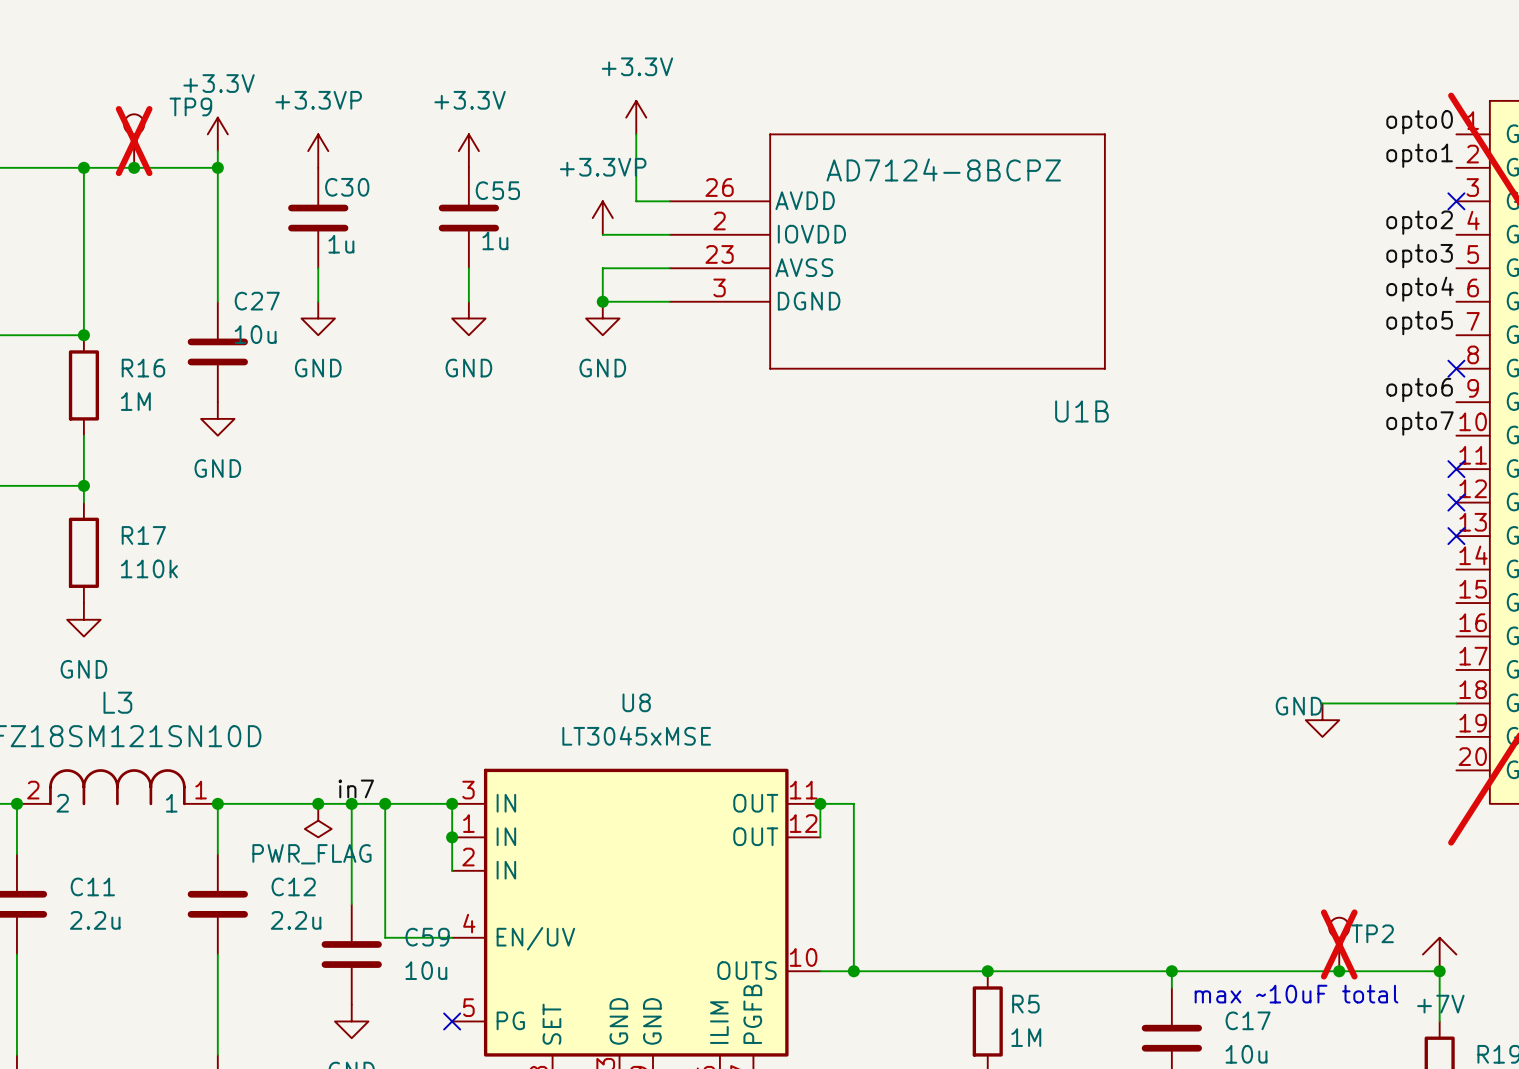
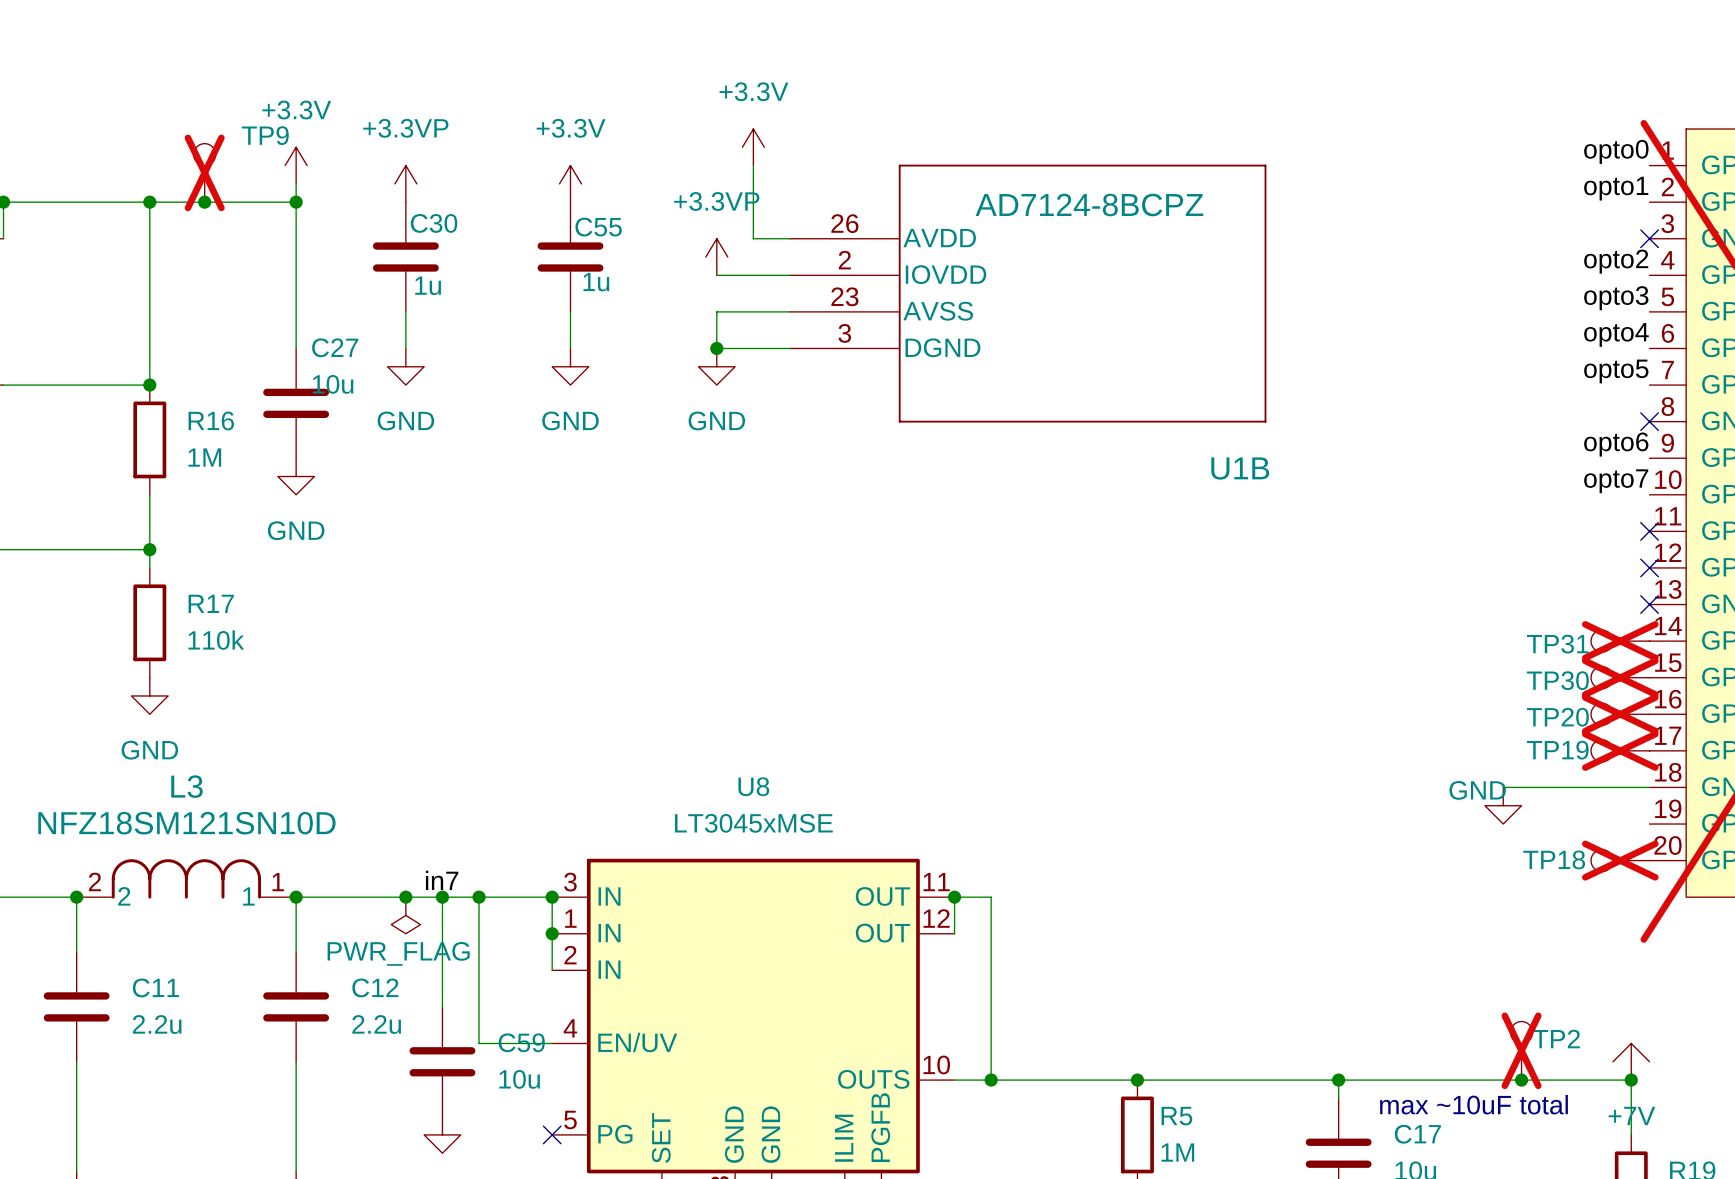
TP31: none -> (1620, 641)
TP30: none -> (1620, 677)
TP20: none -> (1620, 714)
TP19: none -> (1620, 750)
TP18: none -> (1620, 860)

